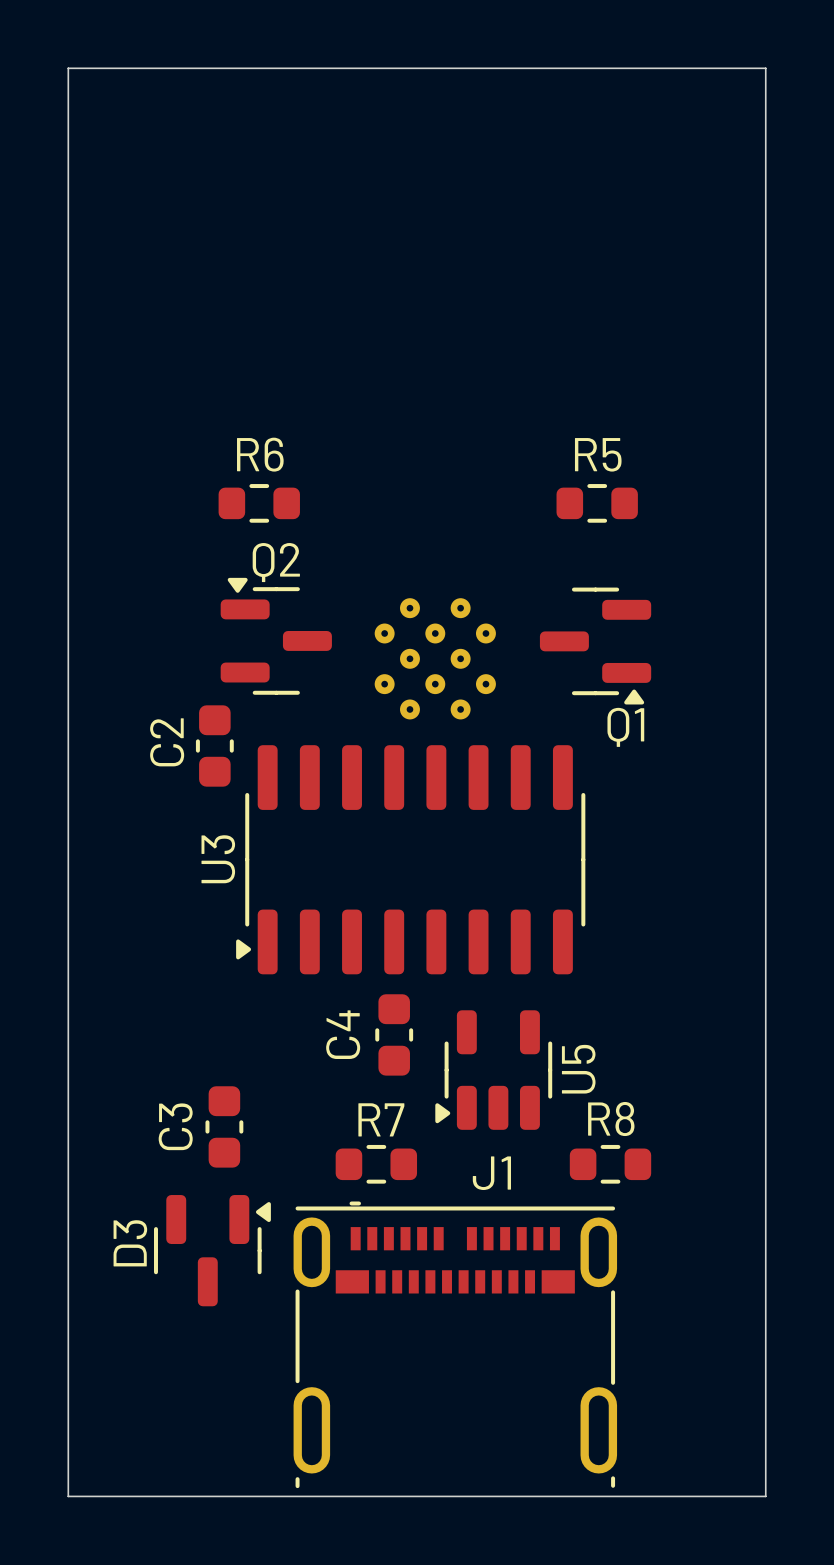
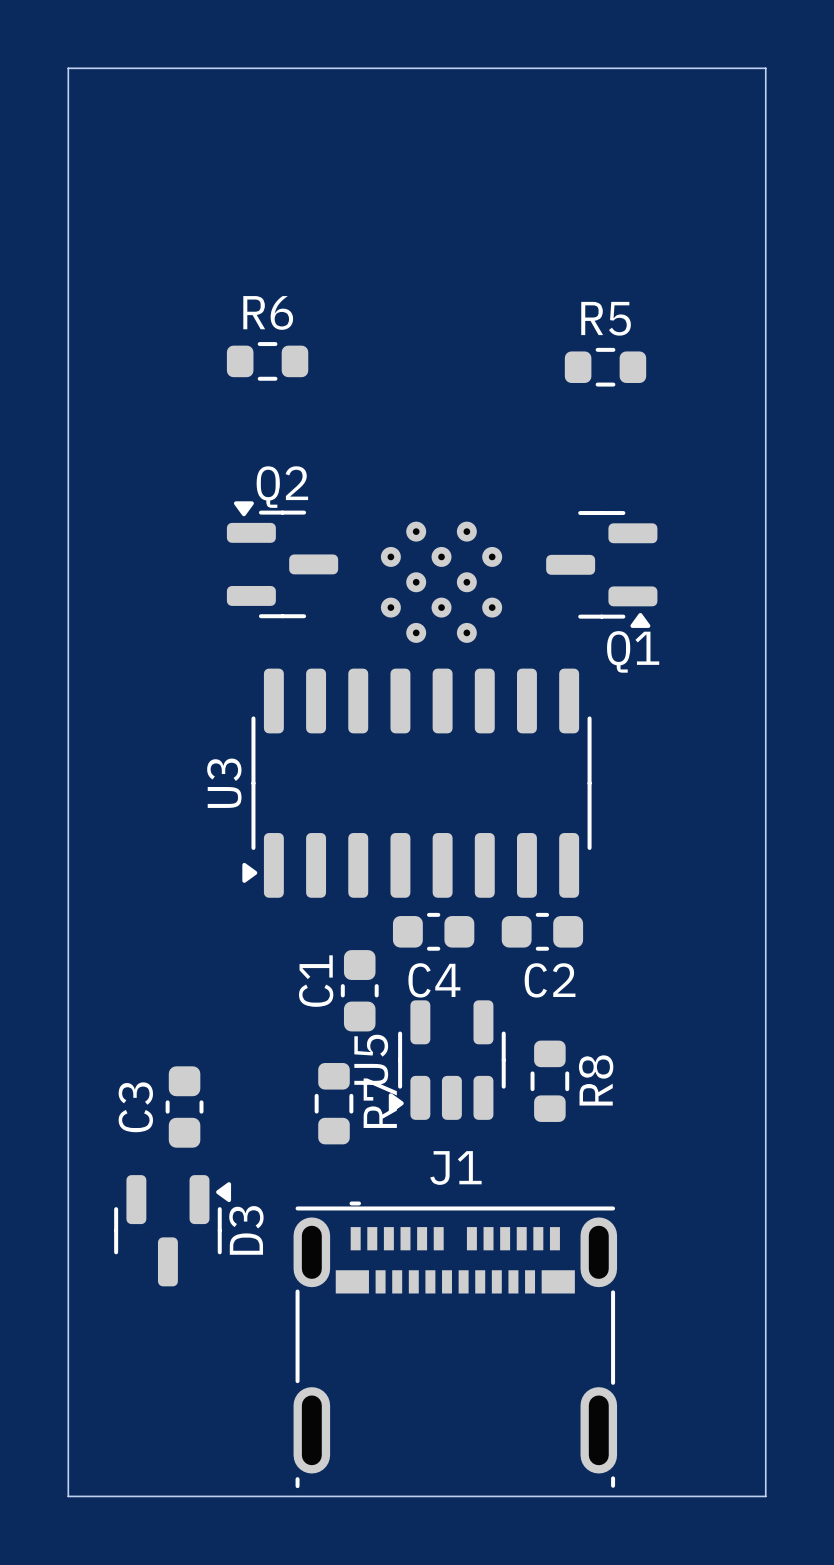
R6 position: (259, 503) -> (267, 361)
R5 position: (597, 503) -> (605, 367)
Q2 position: (276, 636) -> (282, 559)
Q1 position: (595, 646) -> (601, 569)
part position: (435, 658) -> (441, 582)
C2 name position: C2 (167, 742) -> C2 (550, 980)
C2 rotation: 0° (214, 746) -> 90° clockwise (542, 931)
C2 position: (214, 746) -> (542, 931)
U3 position: (410, 859) -> (416, 783)
C1: none -> (359, 990)
C4 name position: C4 (343, 1034) -> C4 (434, 980)
C4 rotation: 0° (394, 1034) -> 90° clockwise (433, 931)
C4 position: (394, 1034) -> (433, 931)
U5 name position: U5 (578, 1069) -> U5 (371, 1059)
U5 position: (493, 1070) -> (447, 1060)
C3 position: (224, 1126) -> (184, 1107)
R7 rotation: 0° (376, 1164) -> 90° clockwise (334, 1103)
R7 position: (376, 1164) -> (334, 1103)
R8 rotation: 0° (610, 1164) -> 90° clockwise (549, 1081)
R8 position: (610, 1164) -> (549, 1081)
J1 name position: J1 (491, 1173) -> J1 (455, 1167)
D3 name position: D3 (130, 1243) -> D3 (246, 1230)
D3 position: (212, 1250) -> (172, 1230)

